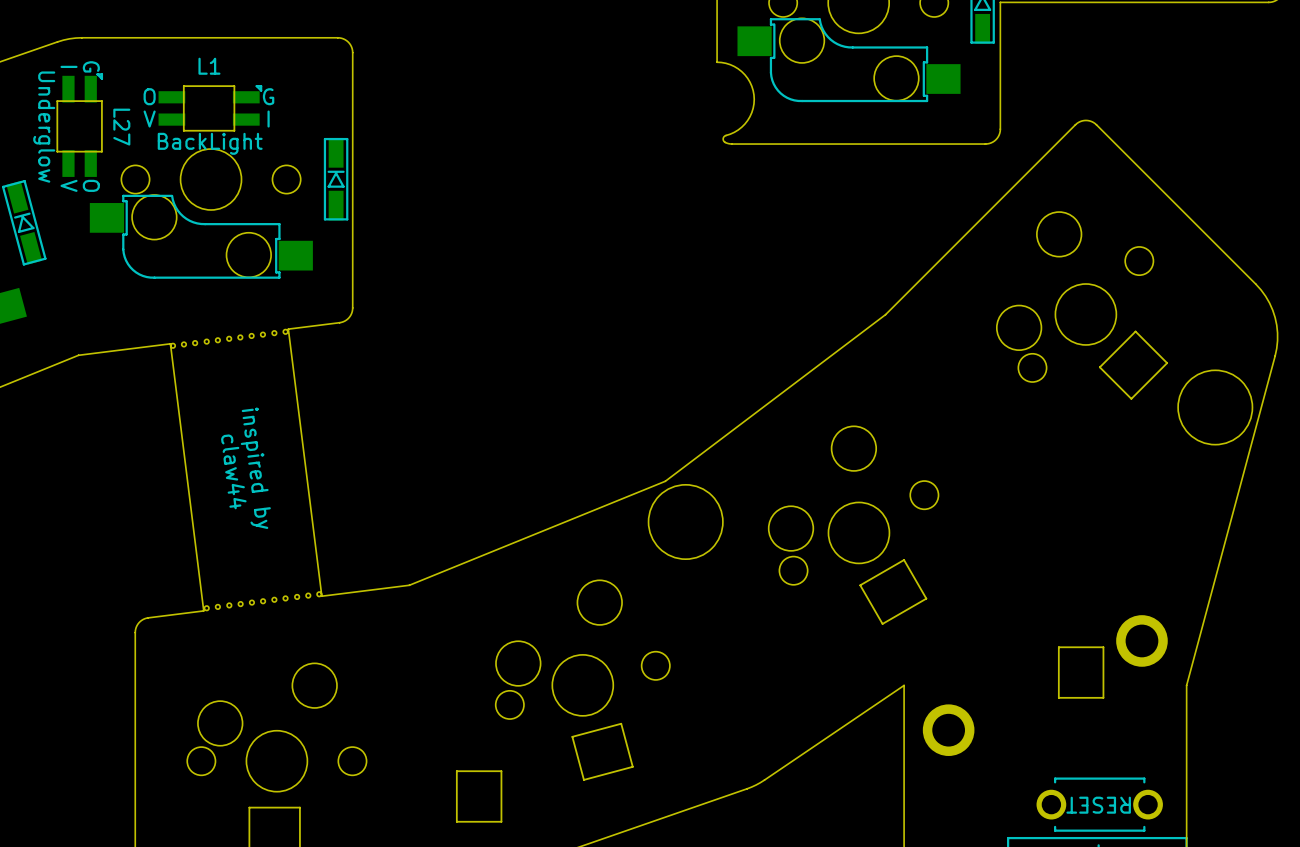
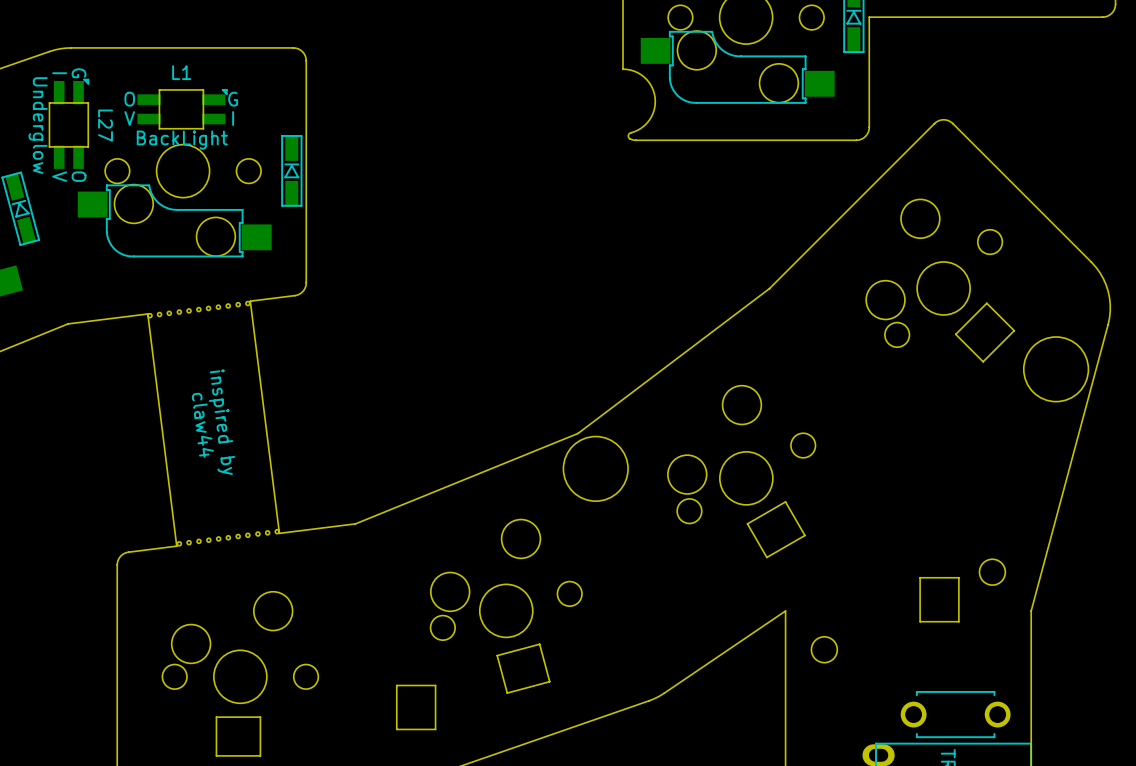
round board edge: none -> [979, 558, 1006, 586]
part: (1141, 640) -> none
round board edge: none -> [811, 636, 838, 664]
part: (948, 730) -> none
part text: RESET (1098, 805) -> none

